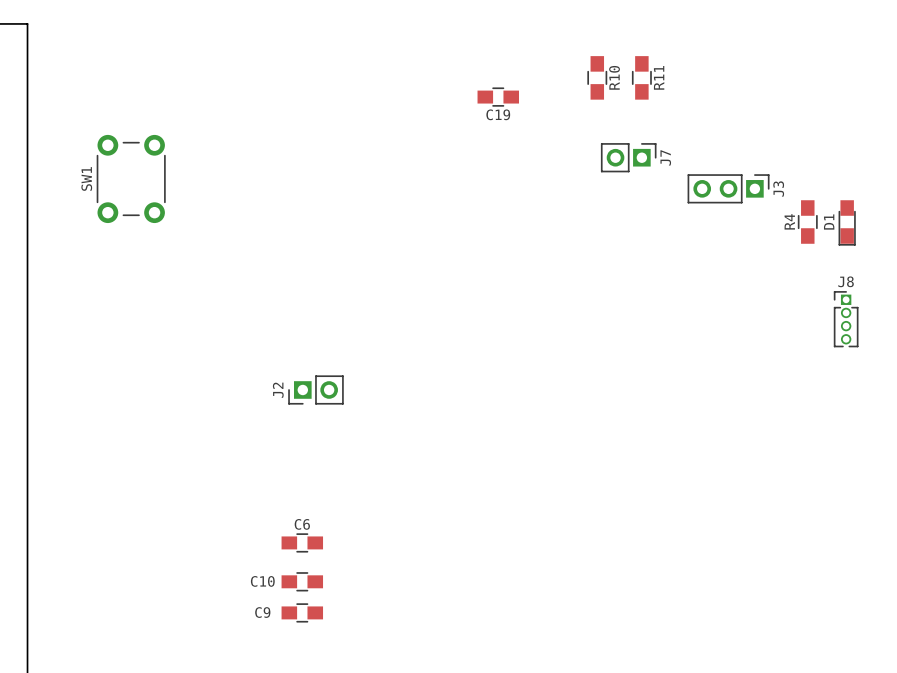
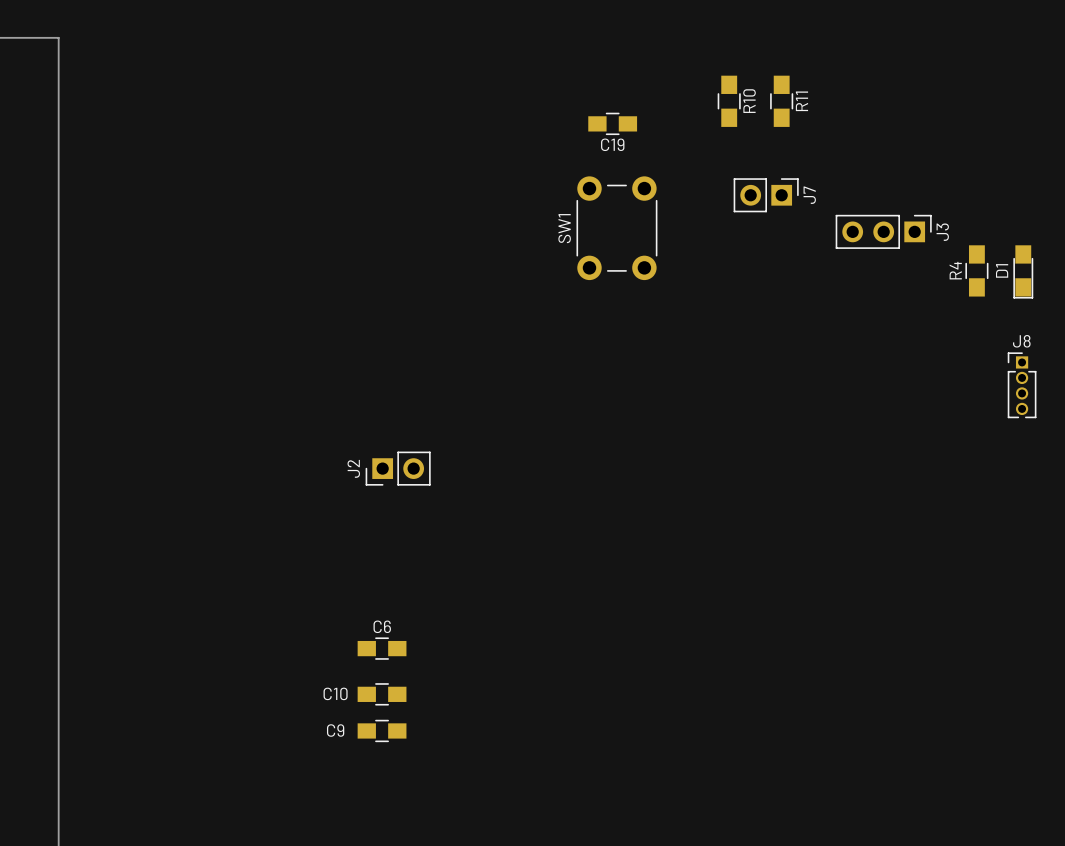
SW1 position: (131, 178) -> (616, 228)

